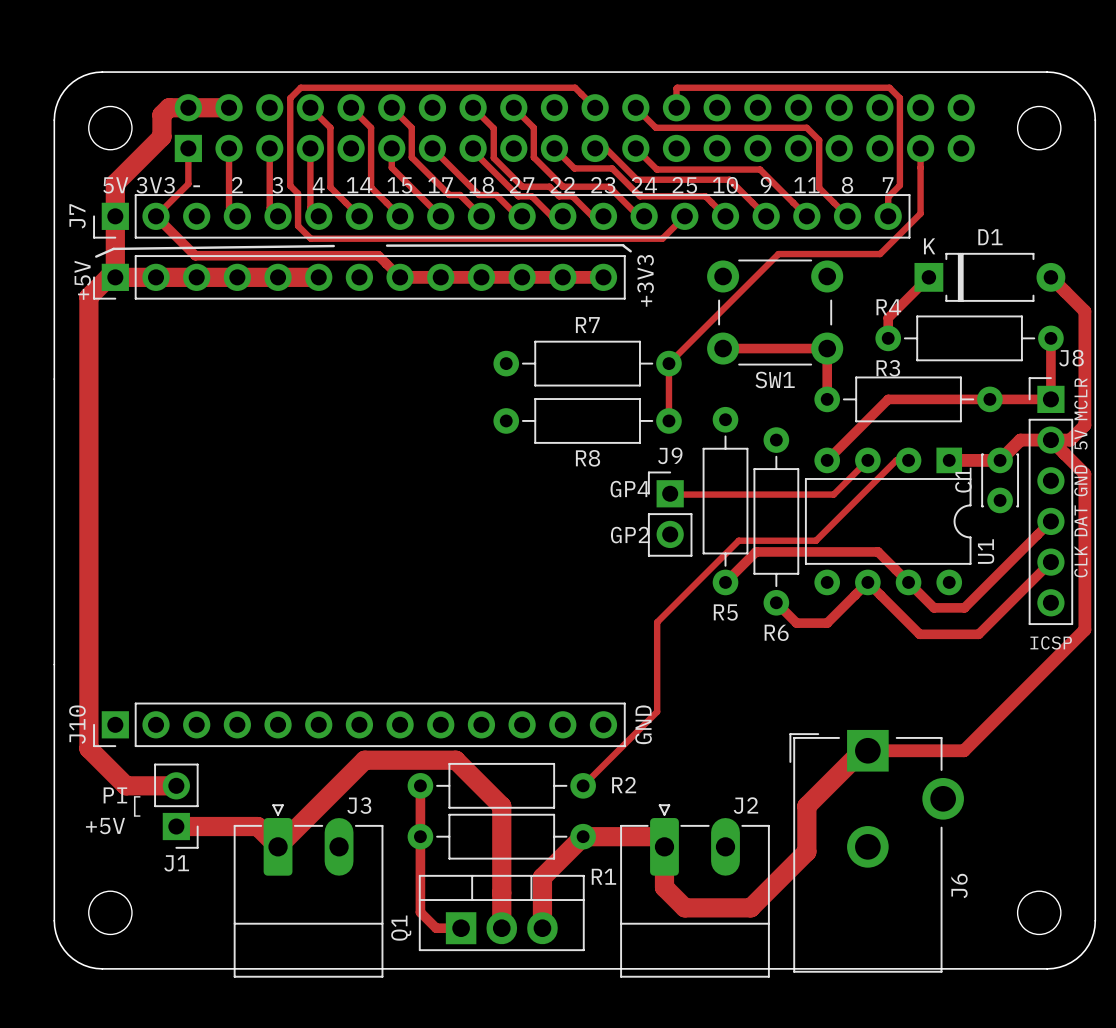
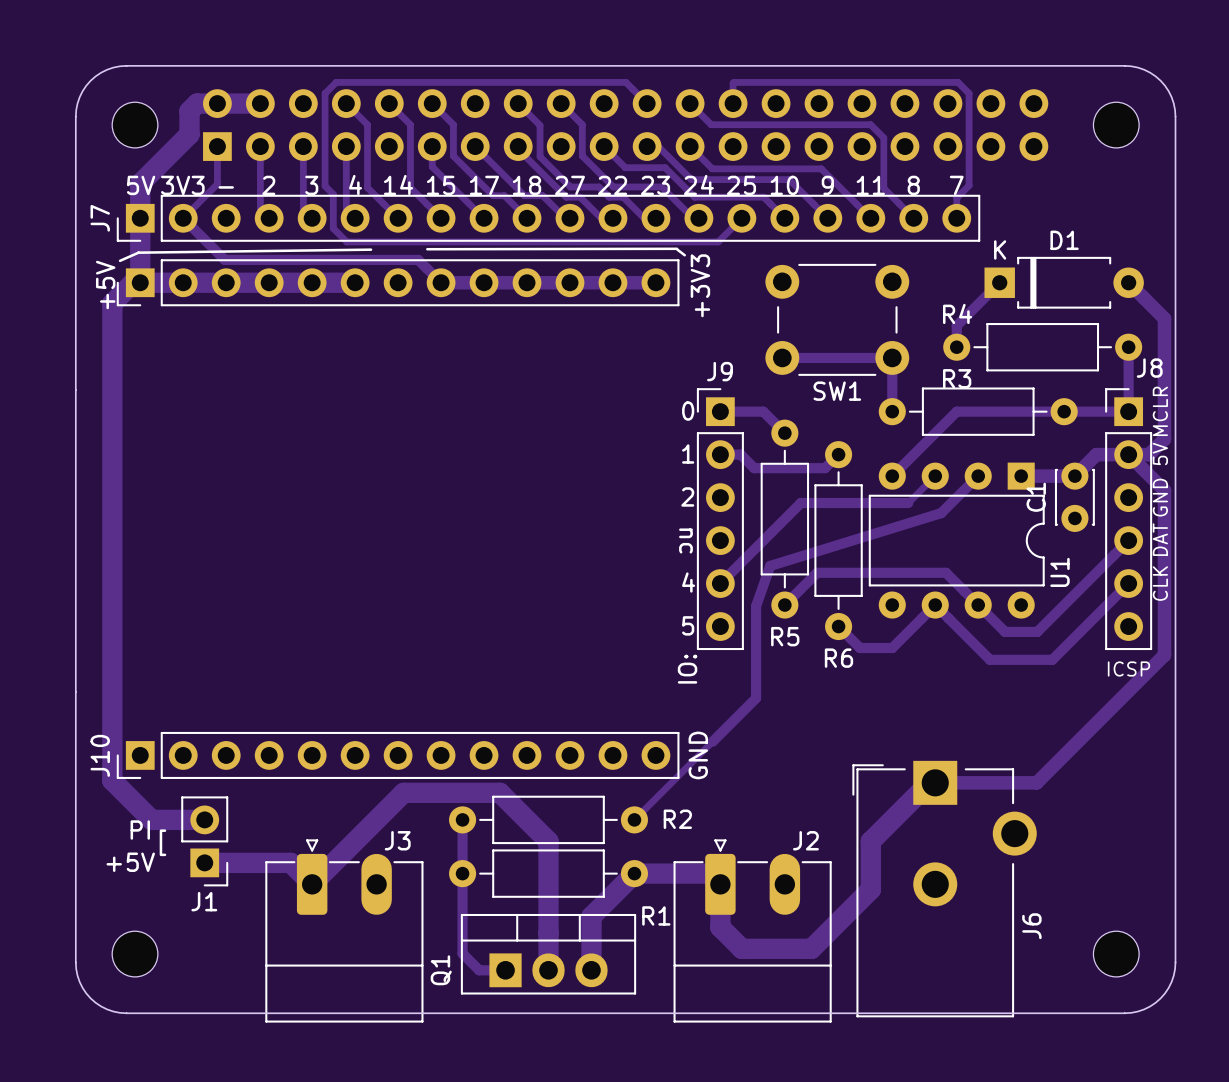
track: (920, 148) (920, 213) (880, 254) (778, 254) (668, 363) (668, 420) -> none
R7: (587, 363) -> none
text: none -> 0 (688, 411)
track: none -> (720, 411) (763, 411) (784, 433)
R8: (587, 420) -> none
text: none -> 1 (688, 454)
track: none -> (720, 454) (740, 454) (754, 468) (825, 468) (838, 454)
J9 name position: J9 (670, 455) -> J9 (719, 371)
track: (908, 460) (896, 460) (816, 540) (738, 540) (657, 622) (657, 711) -> (978, 476) (941, 513) (770, 565) (756, 606) (756, 698) (712, 741)
J9 footprint: [647, 471, 693, 557] -> [696, 388, 744, 651]
track: (842, 485) (833, 494) (677, 494) -> (908, 502) (800, 502) (720, 583)
text: GP4 (630, 489) -> 2 (687, 496)
text: none -> nc (685, 540)
text: GP2 (630, 535) -> none
text: none -> 4 (688, 582)
text: none -> 5 (688, 625)
text: none -> IO: (687, 669)

